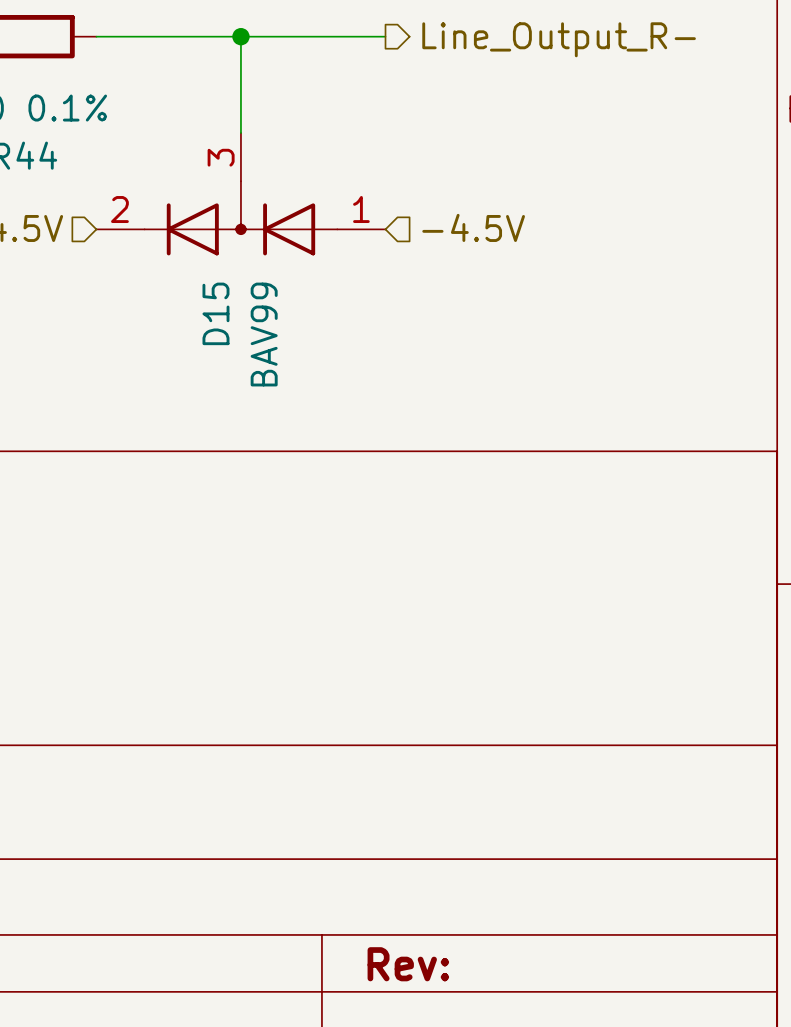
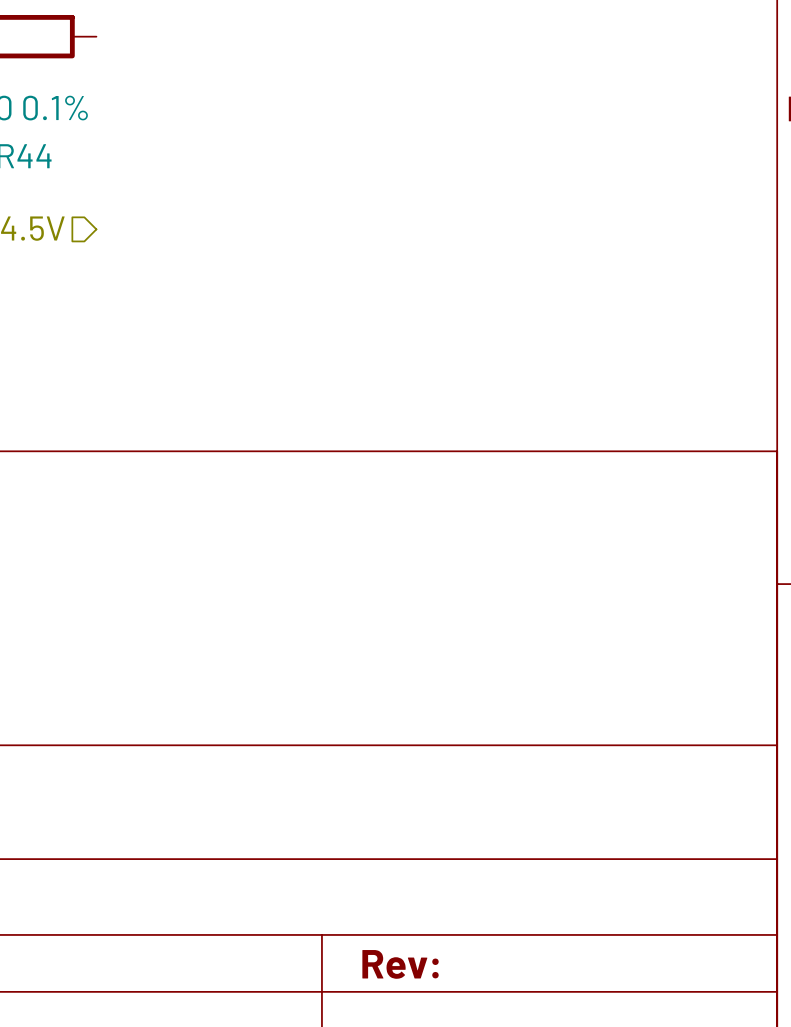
wire: (96, 36) (385, 36) -> none
wire: (240, 36) (240, 133) -> none
junction: (240, 36) -> none
hierarchical label: Line_Output_R- (559, 39) -> none
D15: BAV99 (240, 194) -> none
hierarchical label: -4.5V (473, 227) -> none

